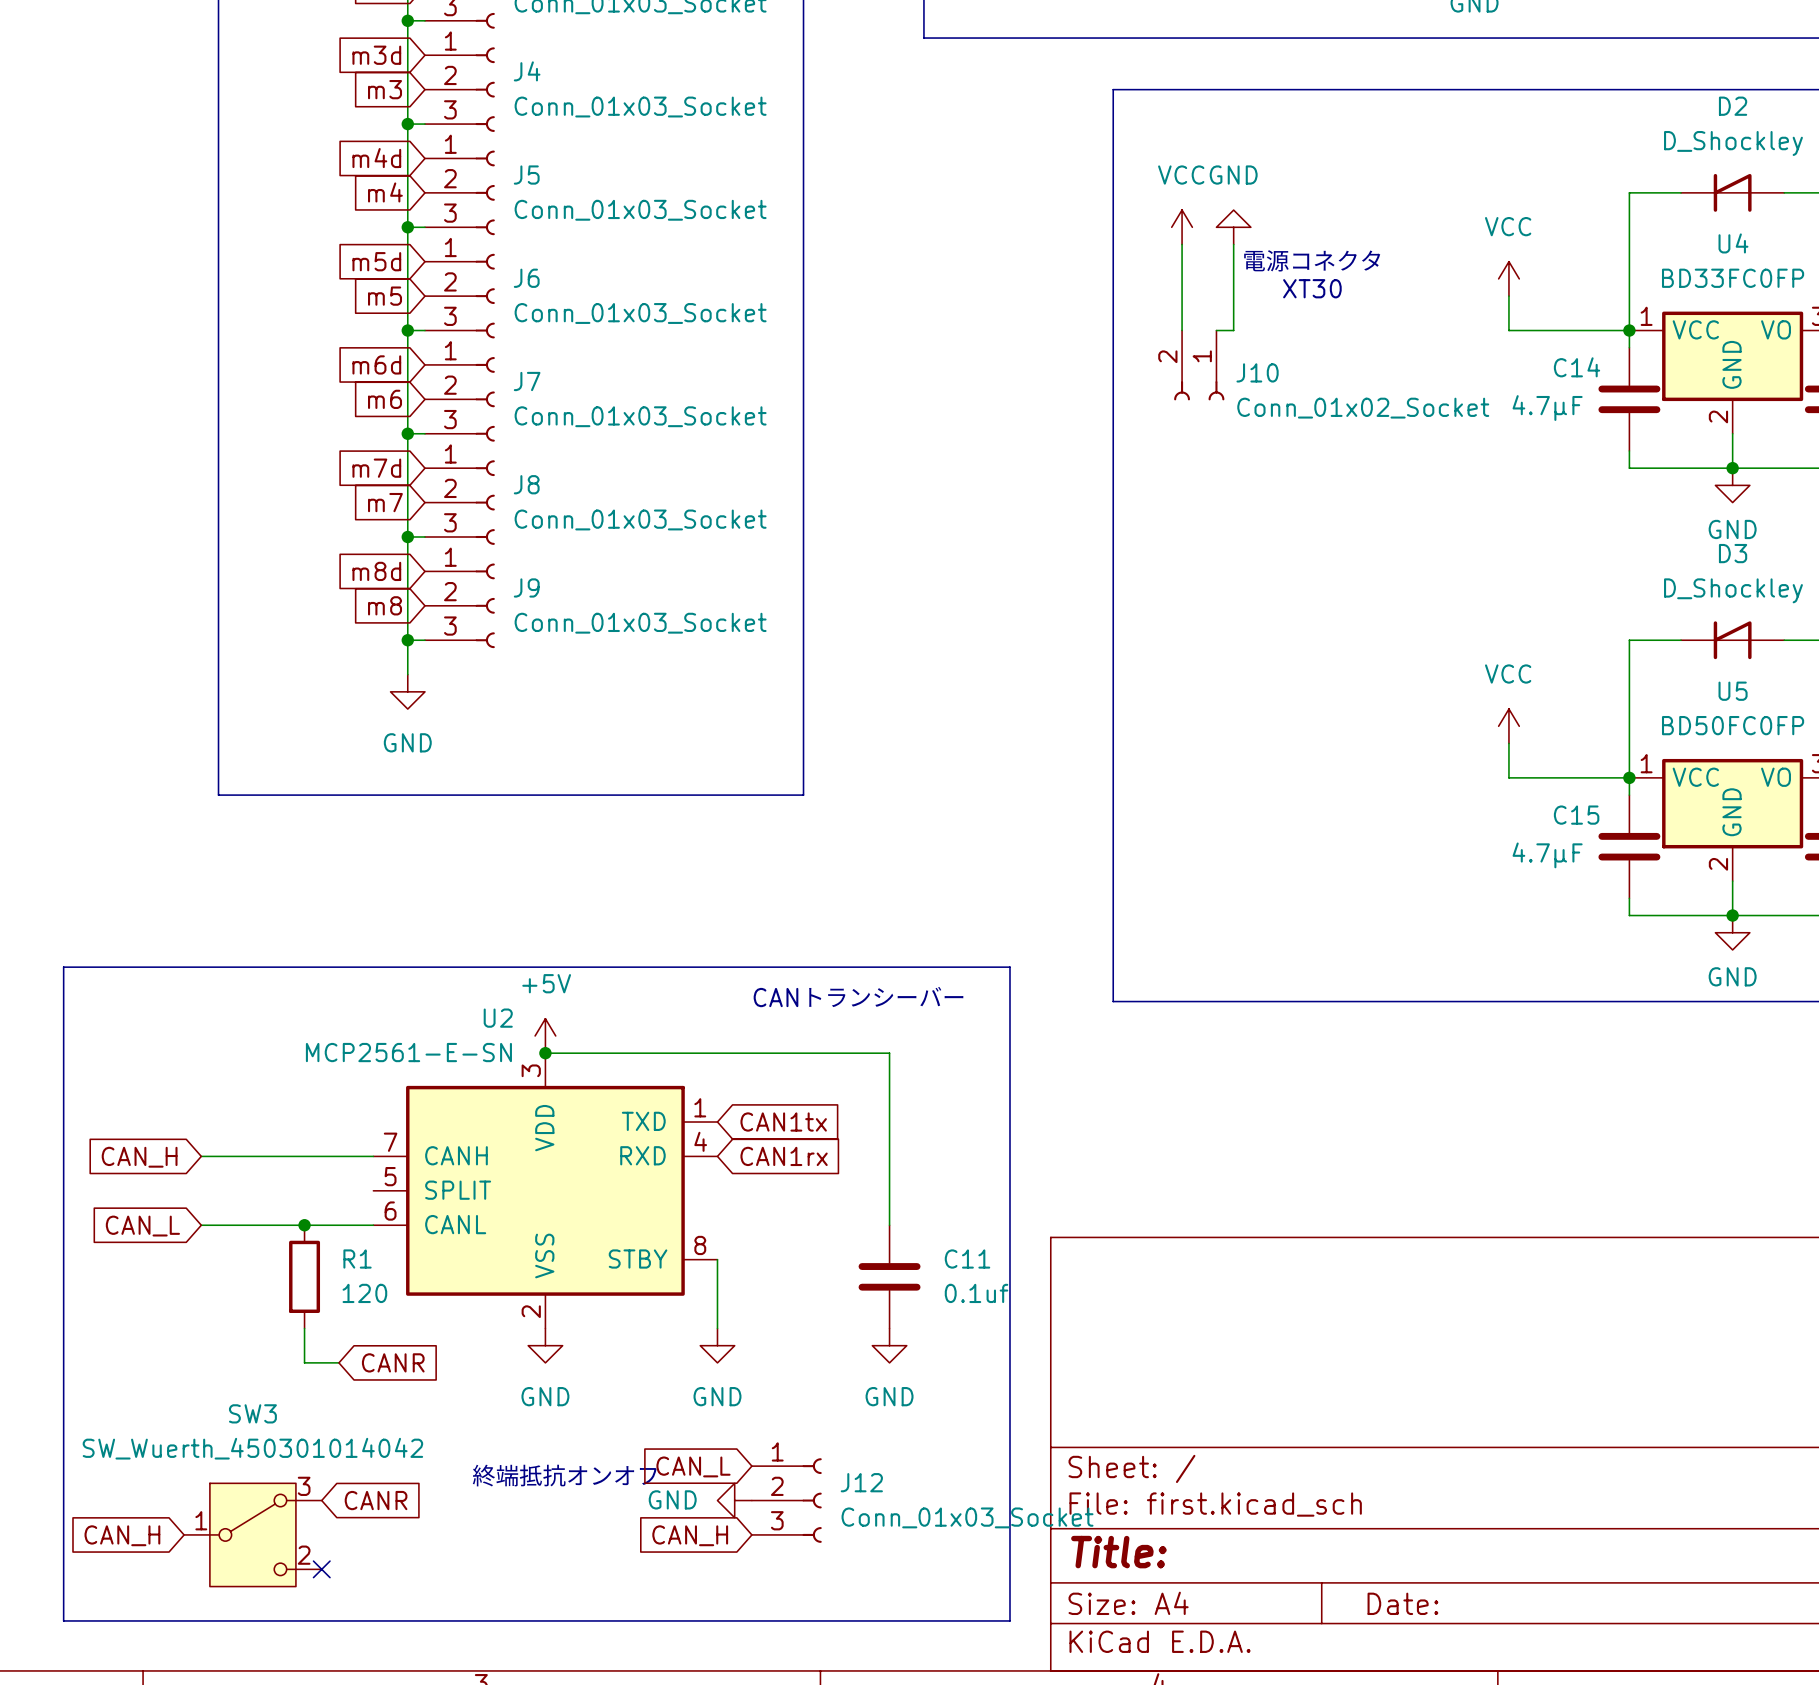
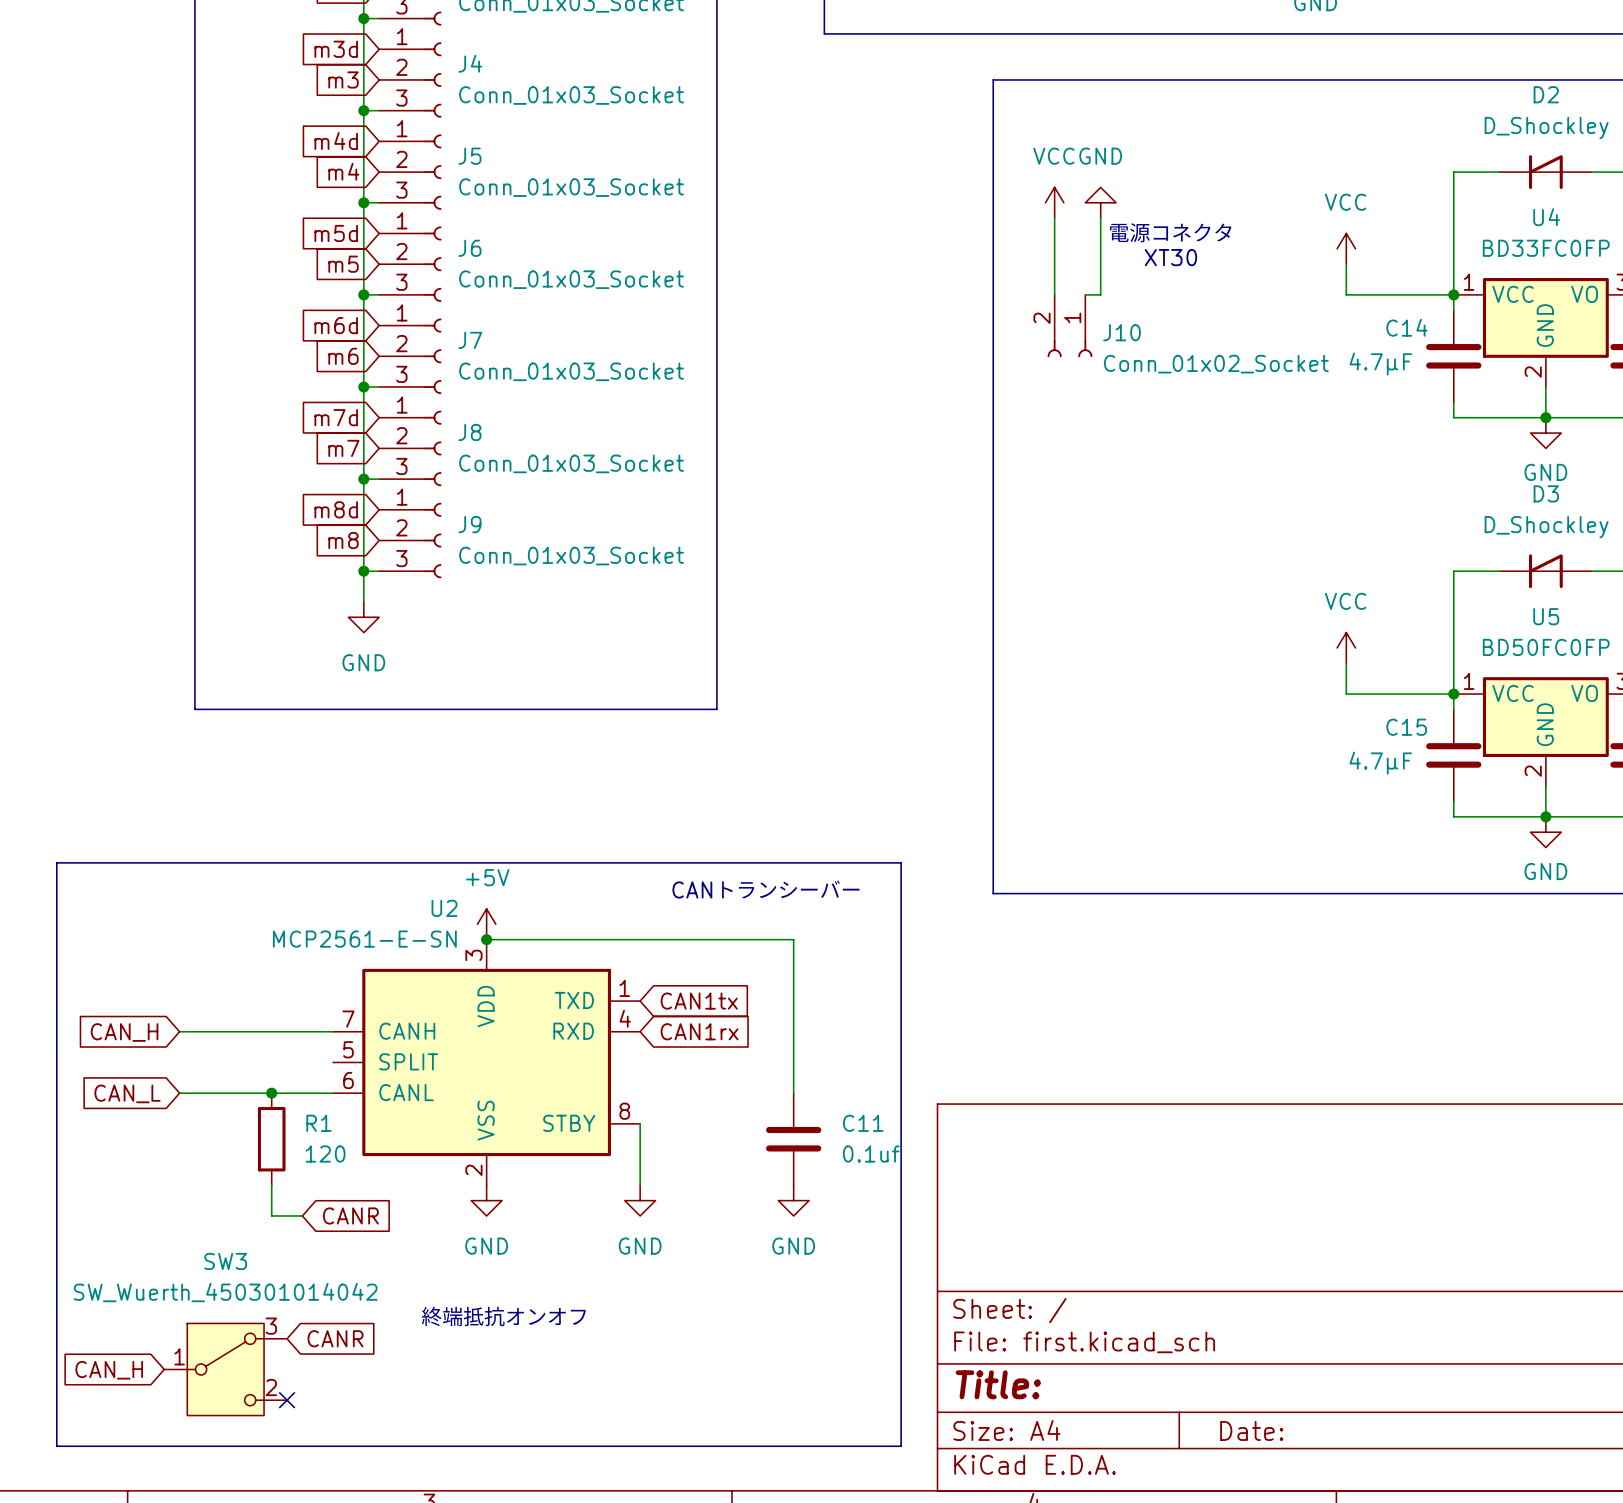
global label: CAN_L (693, 1466) -> none
power symbol: GND (734, 1500) -> none
J12: Conn_01x03_Socket (786, 1500) -> none
global label: CAN_H (690, 1535) -> none

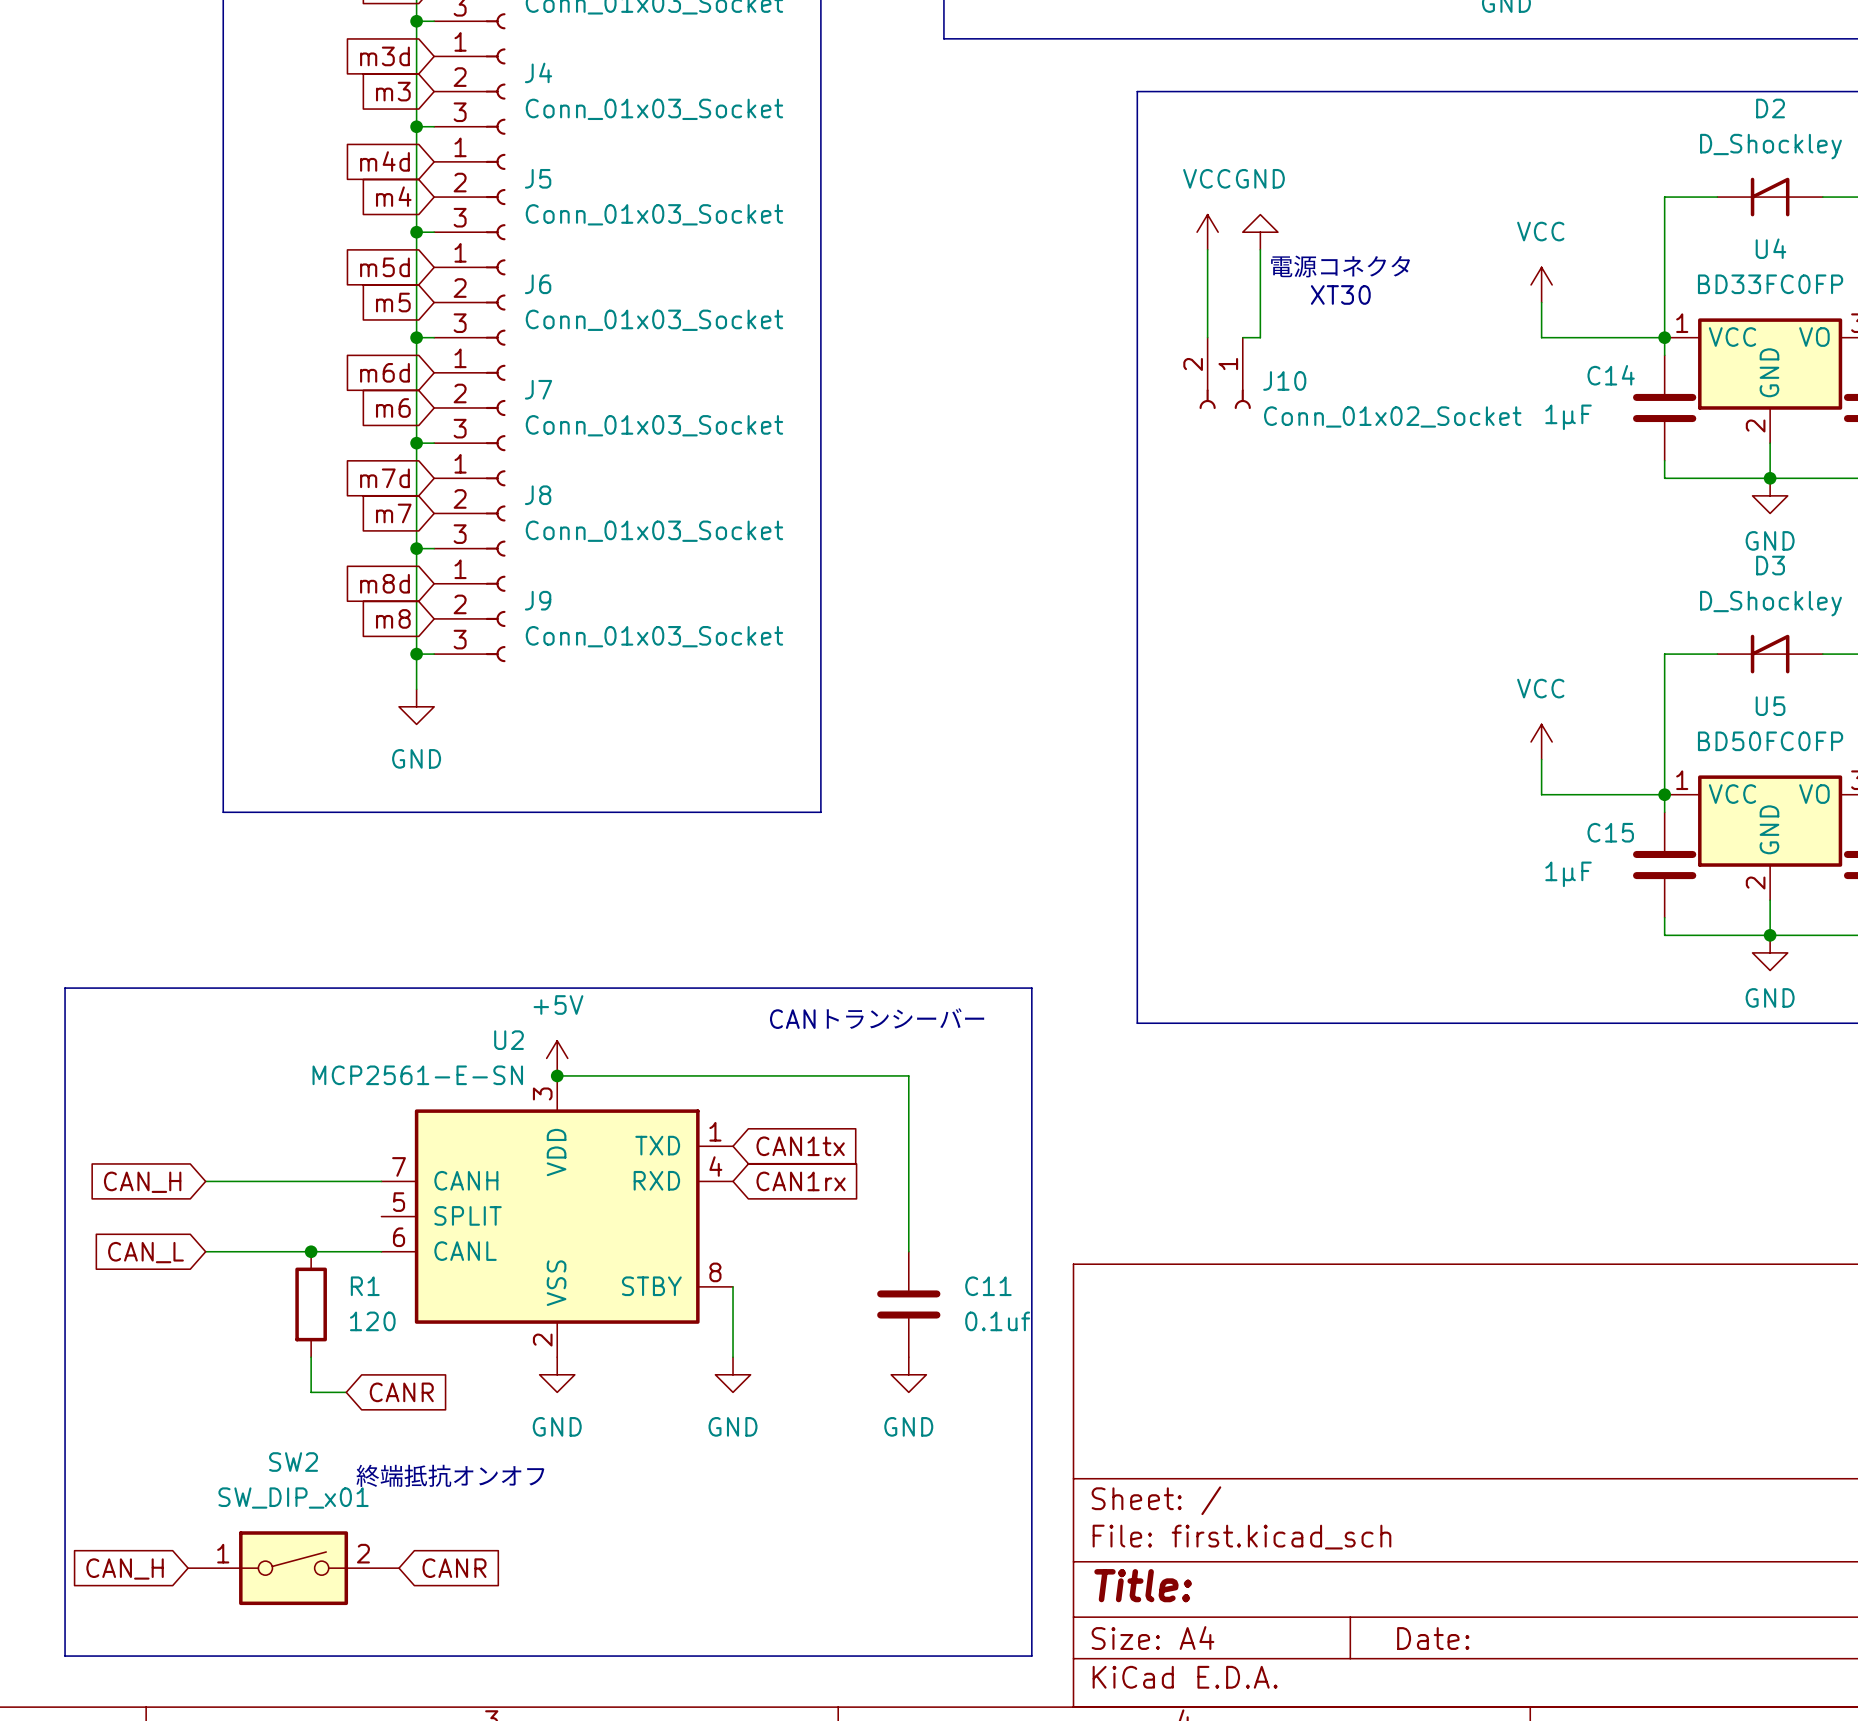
C14 value: 4.7μF (1380, 364) -> 1μF (1568, 417)
C15 value: 4.7μF (1380, 763) -> 1μF (1568, 874)
text position: 終端抵抗オンオフ (503, 1316) -> 終端抵抗オンオフ (450, 1475)
global label position: CANR (335, 1338) -> CANR (454, 1568)
SW3: SW_Wuerth_450301014042 (225, 1369) -> none
SW2: none -> SW_DIP_x01 (293, 1568)
no-connect mark: (287, 1400) -> none

